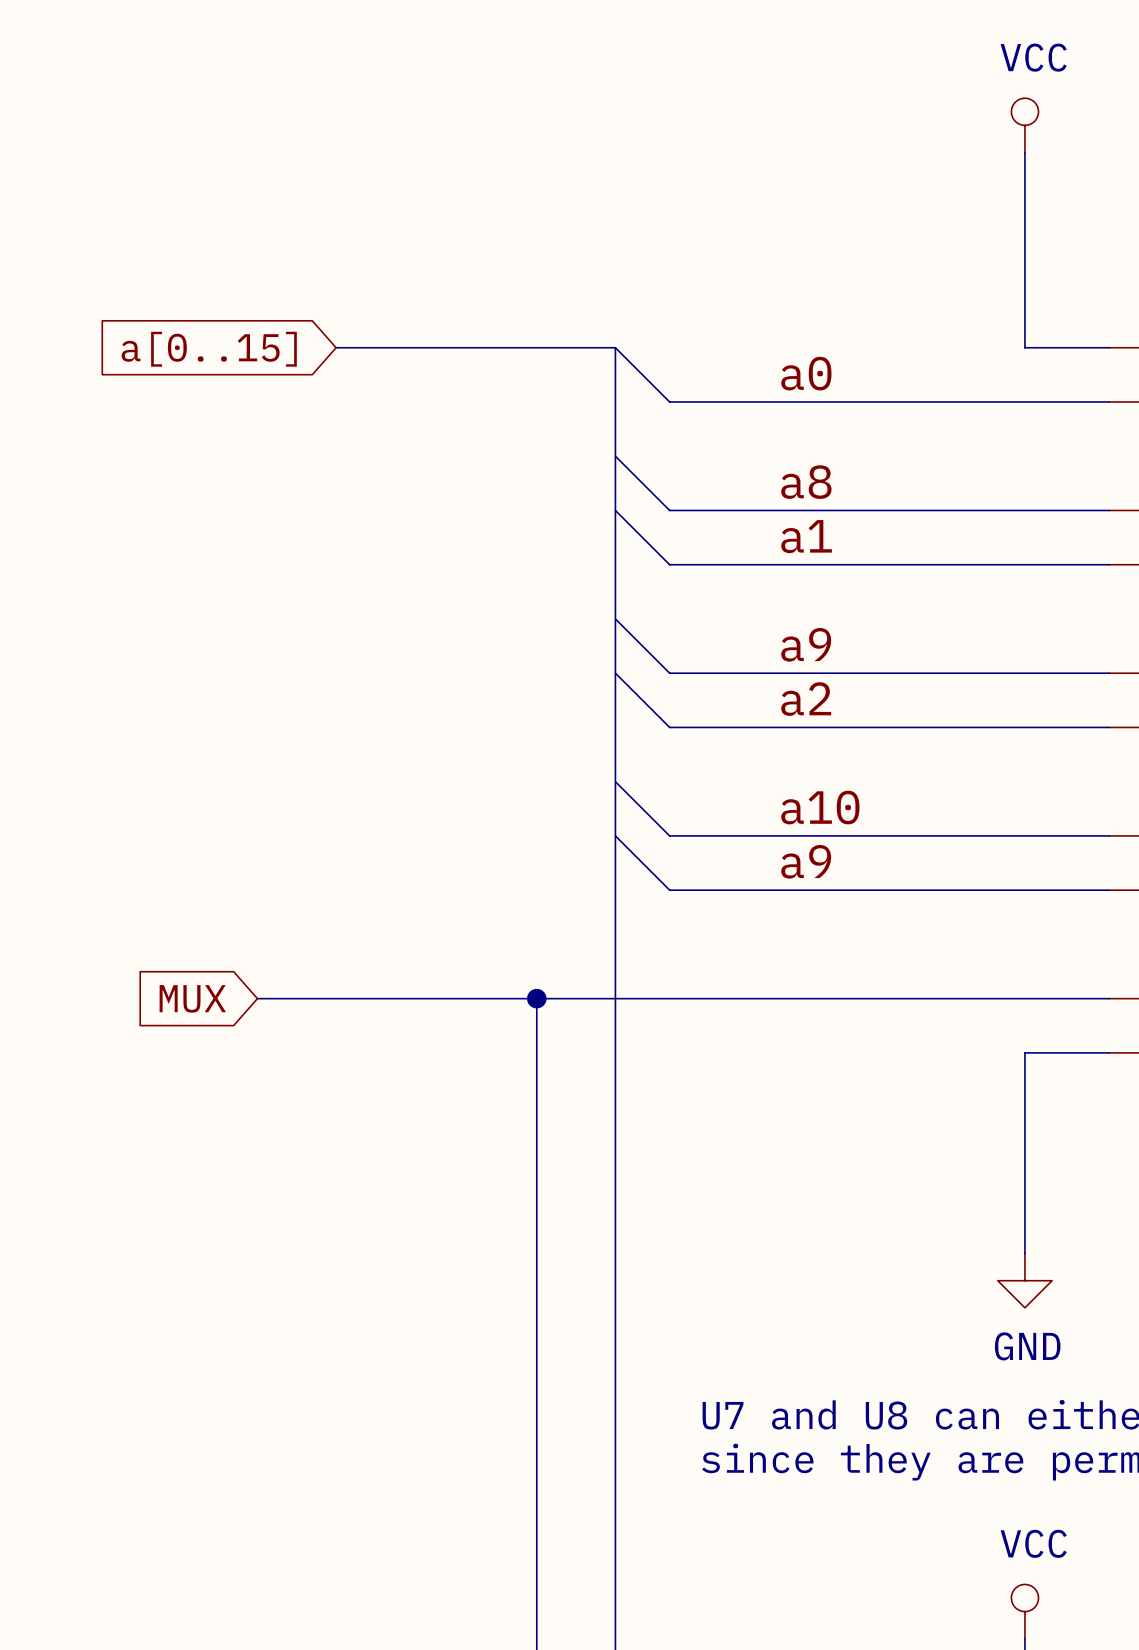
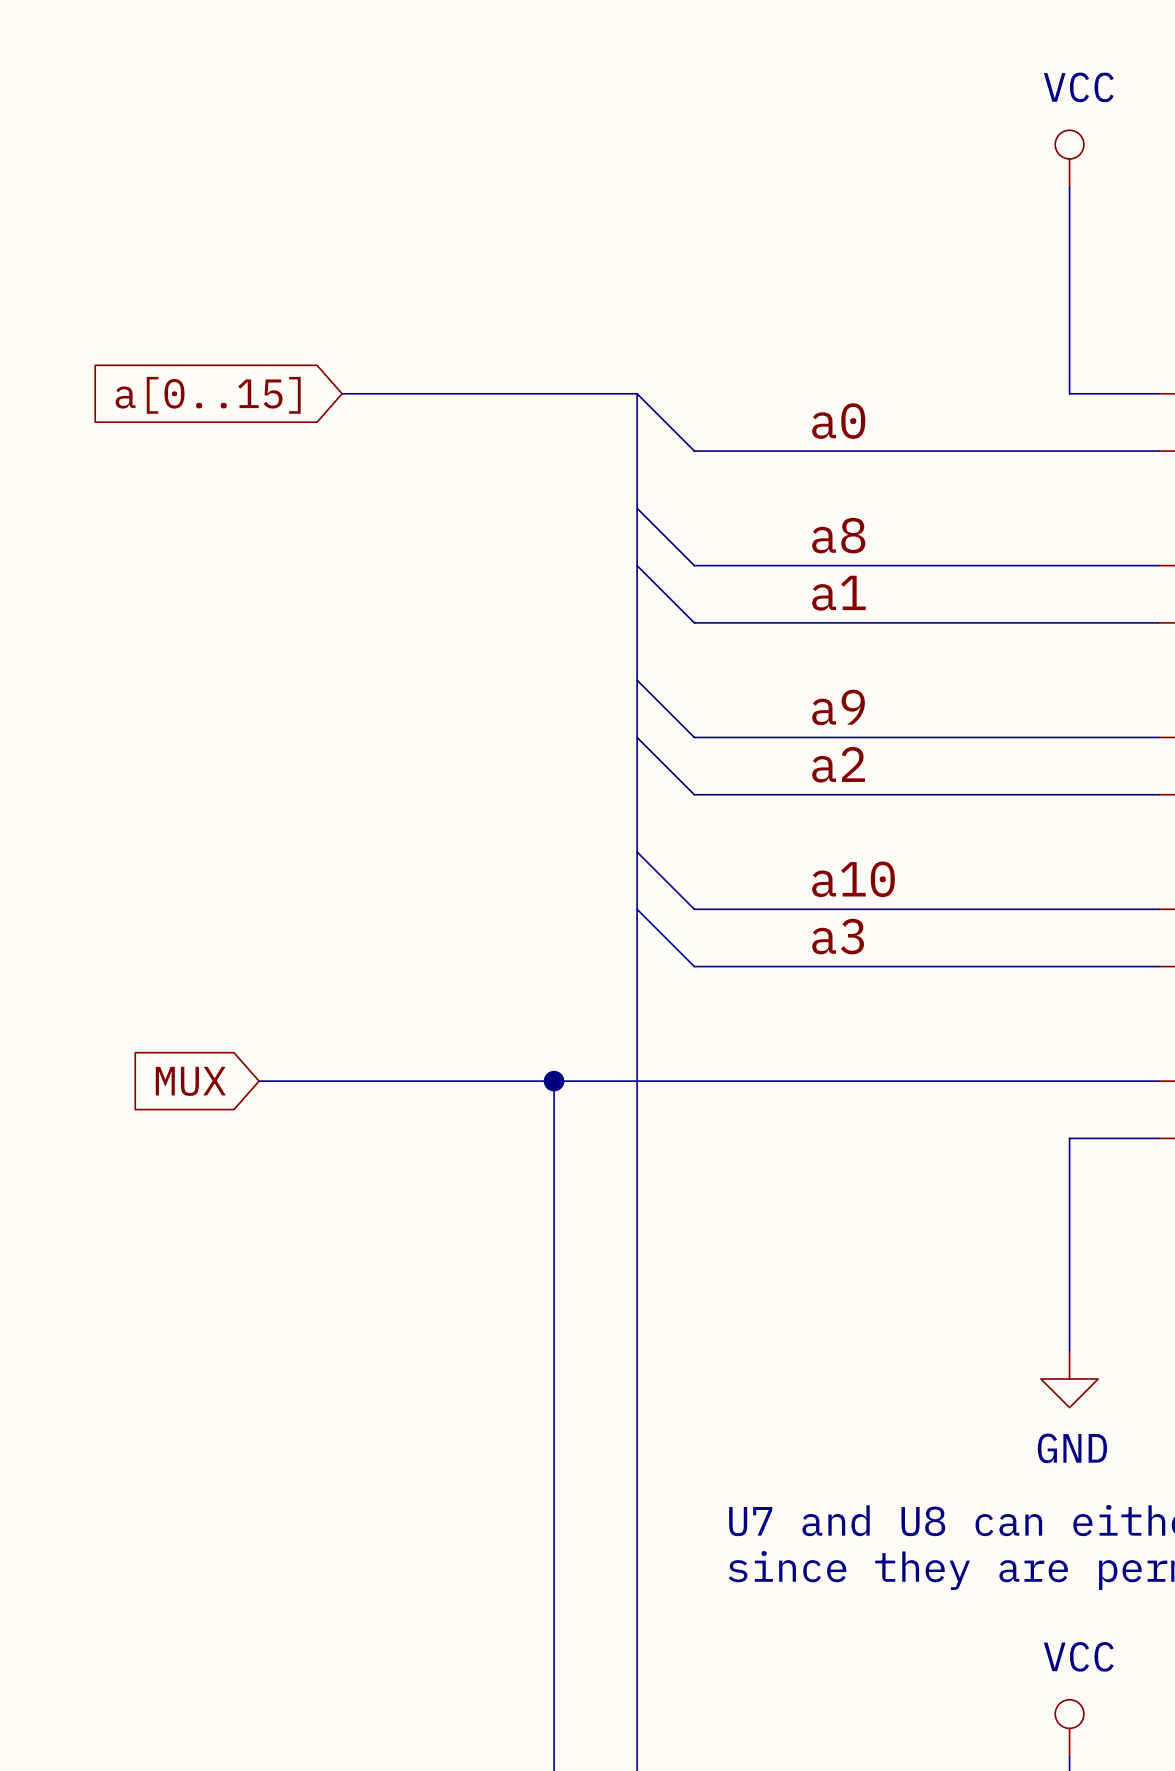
label: a9 (806, 861) -> a3 (838, 936)

